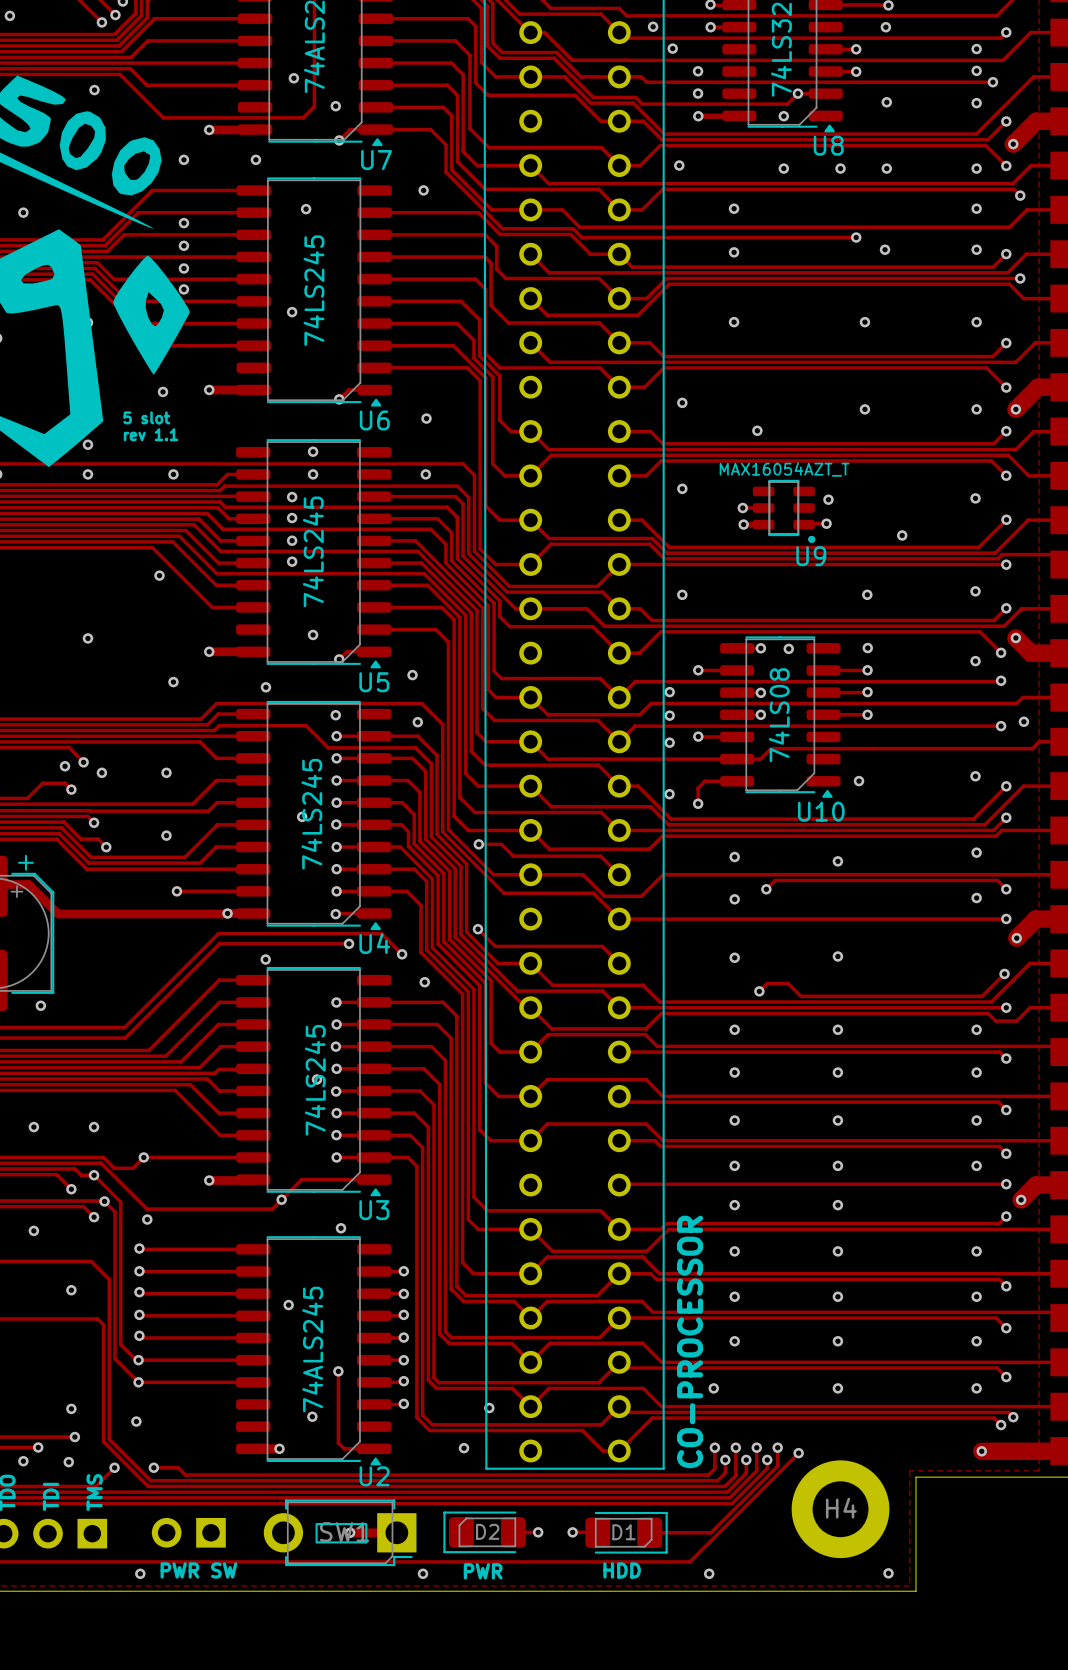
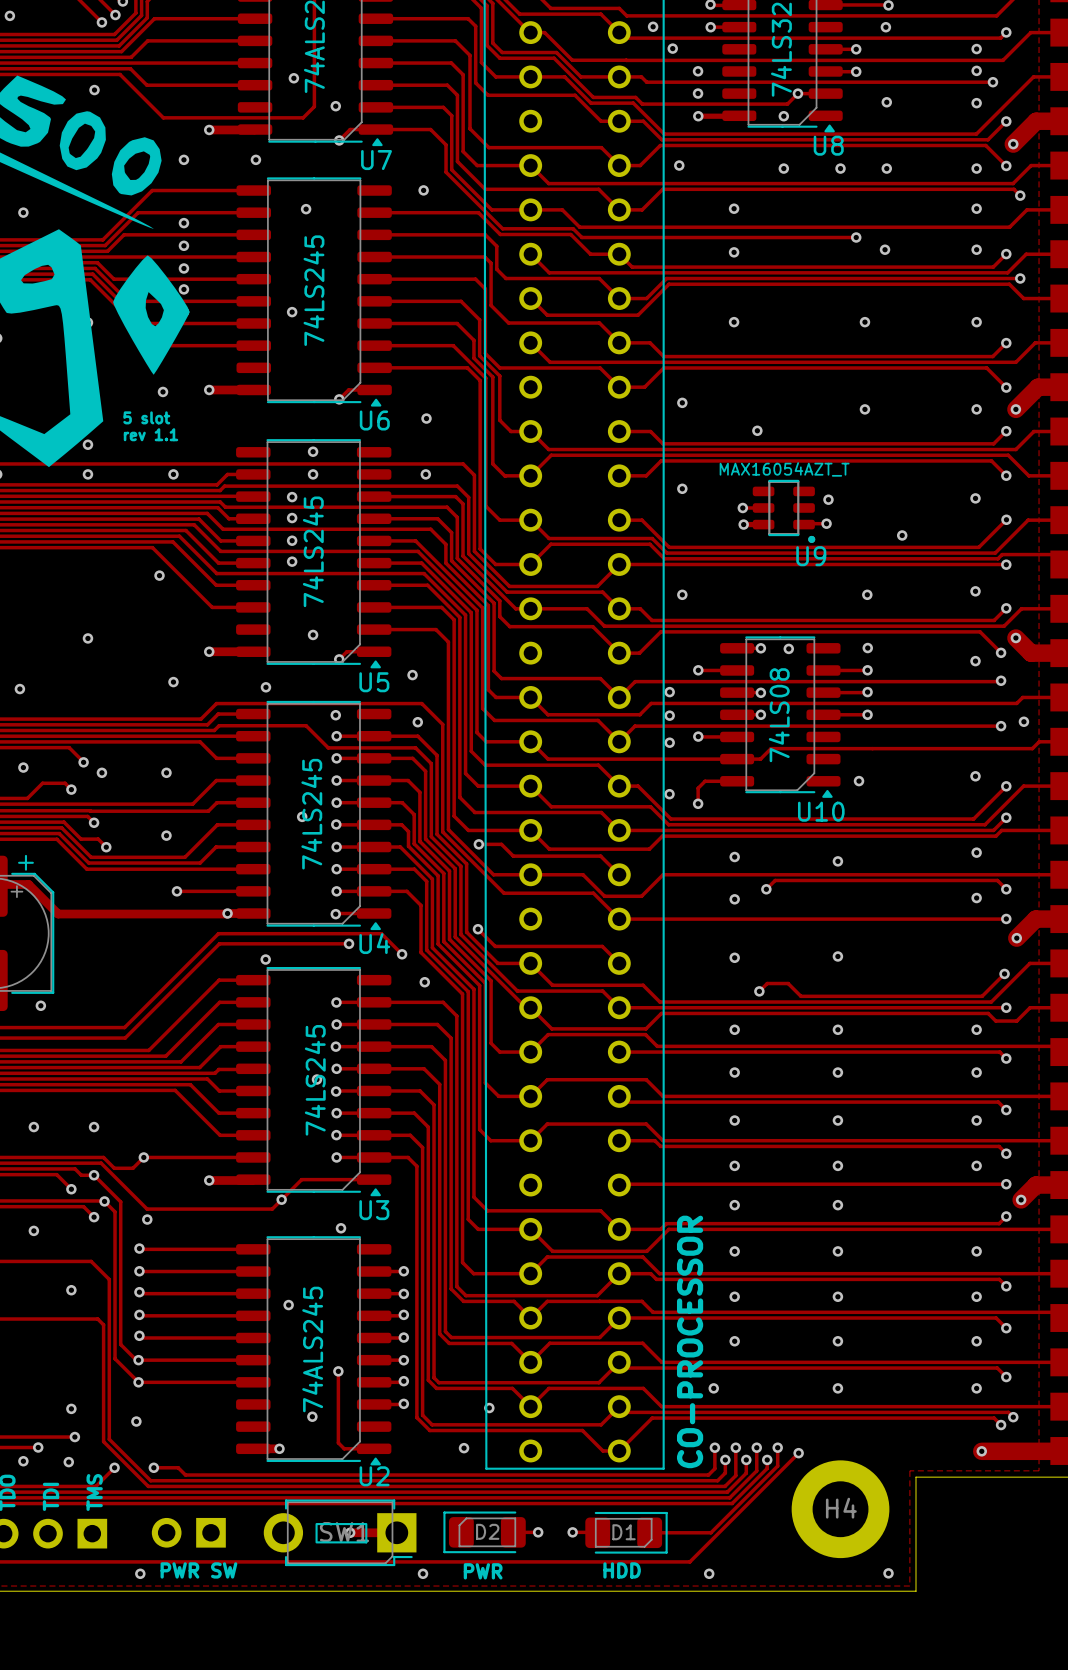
via: none -> (19, 689)
via position: (65, 766) -> (23, 767)

